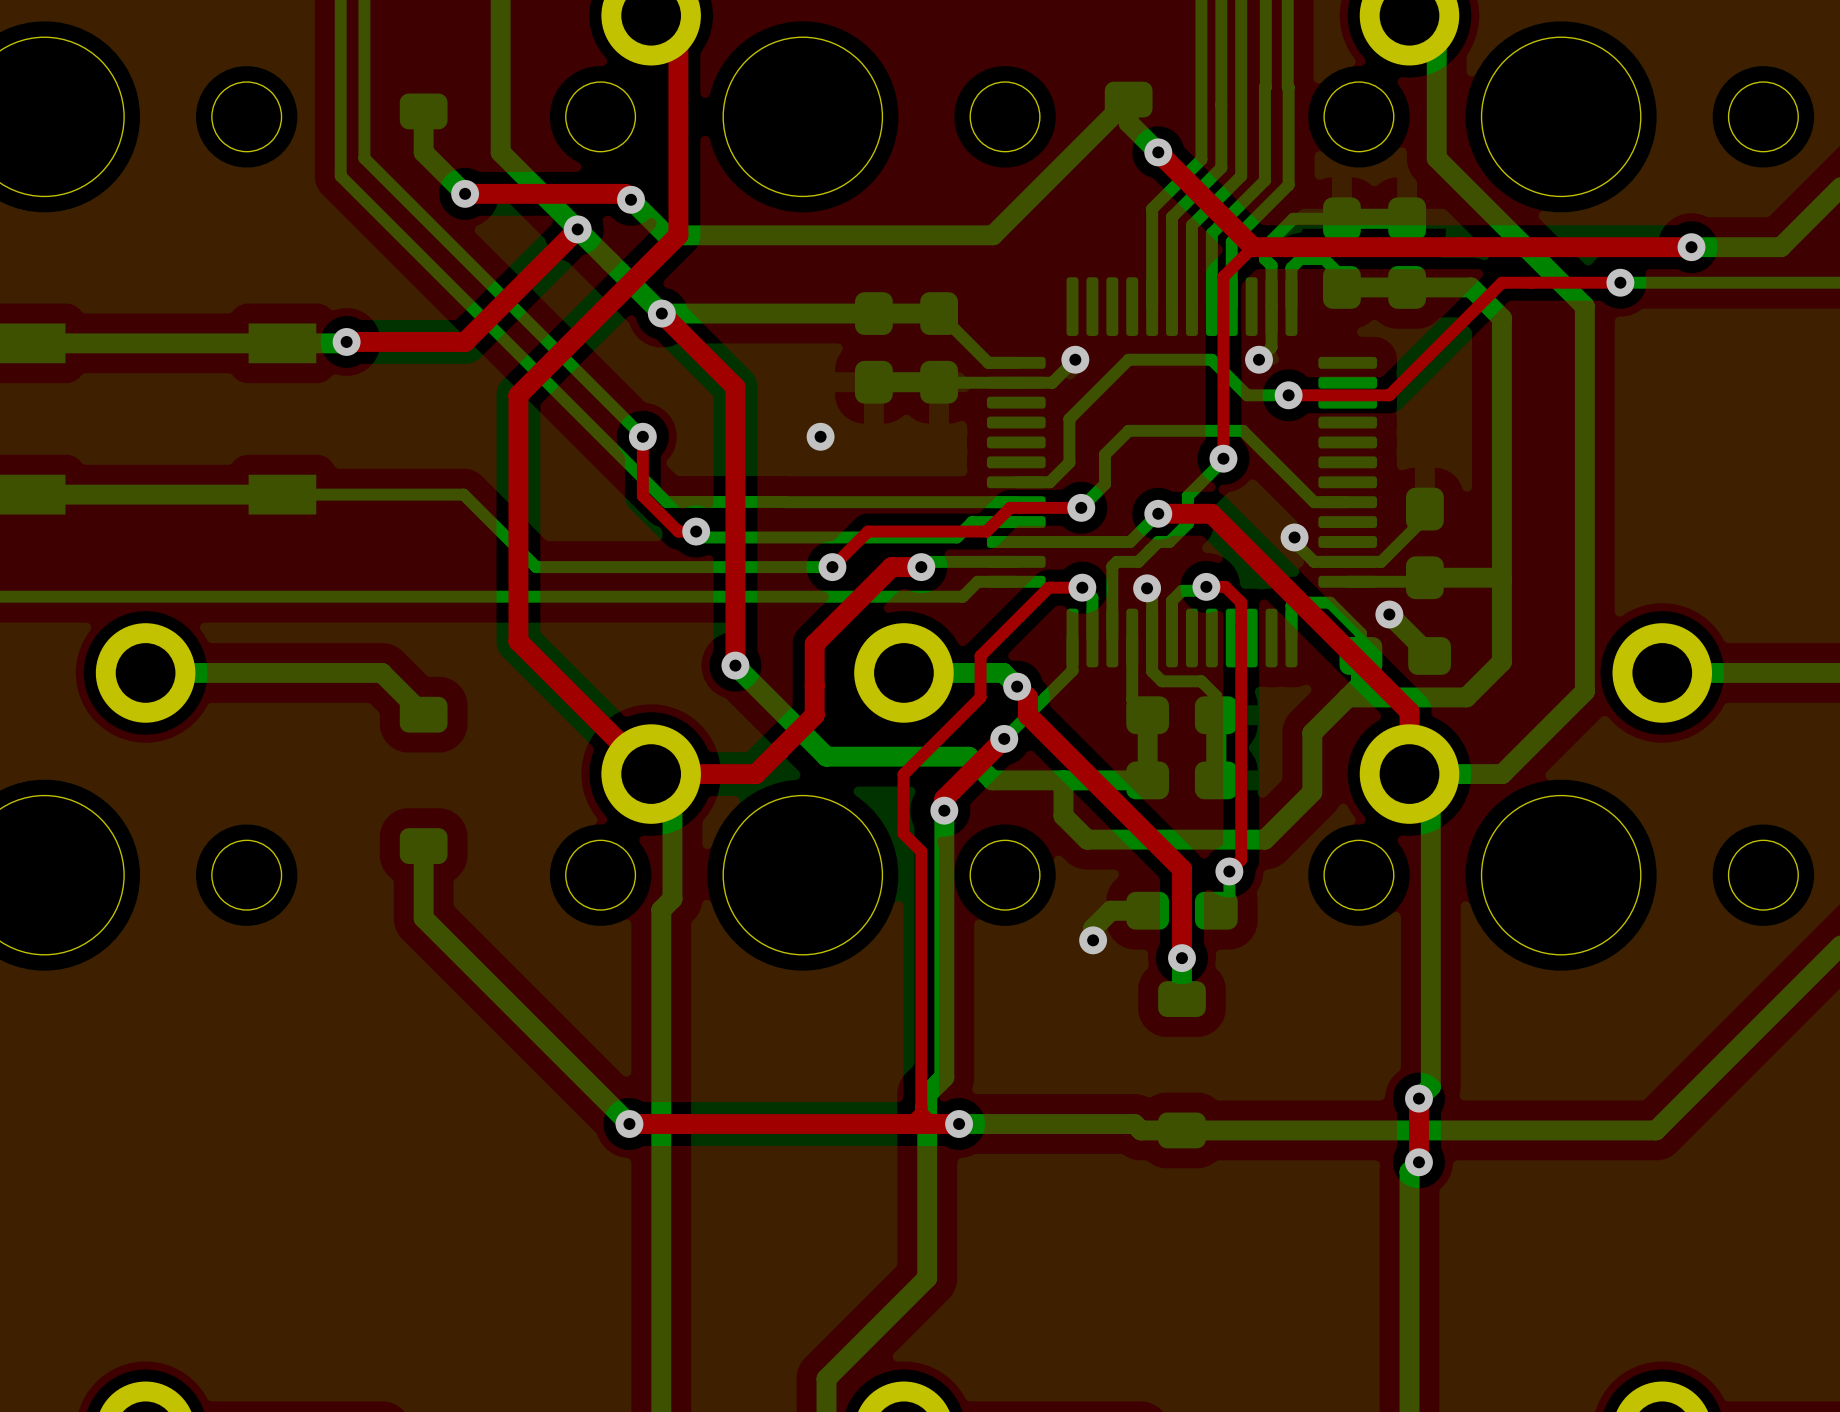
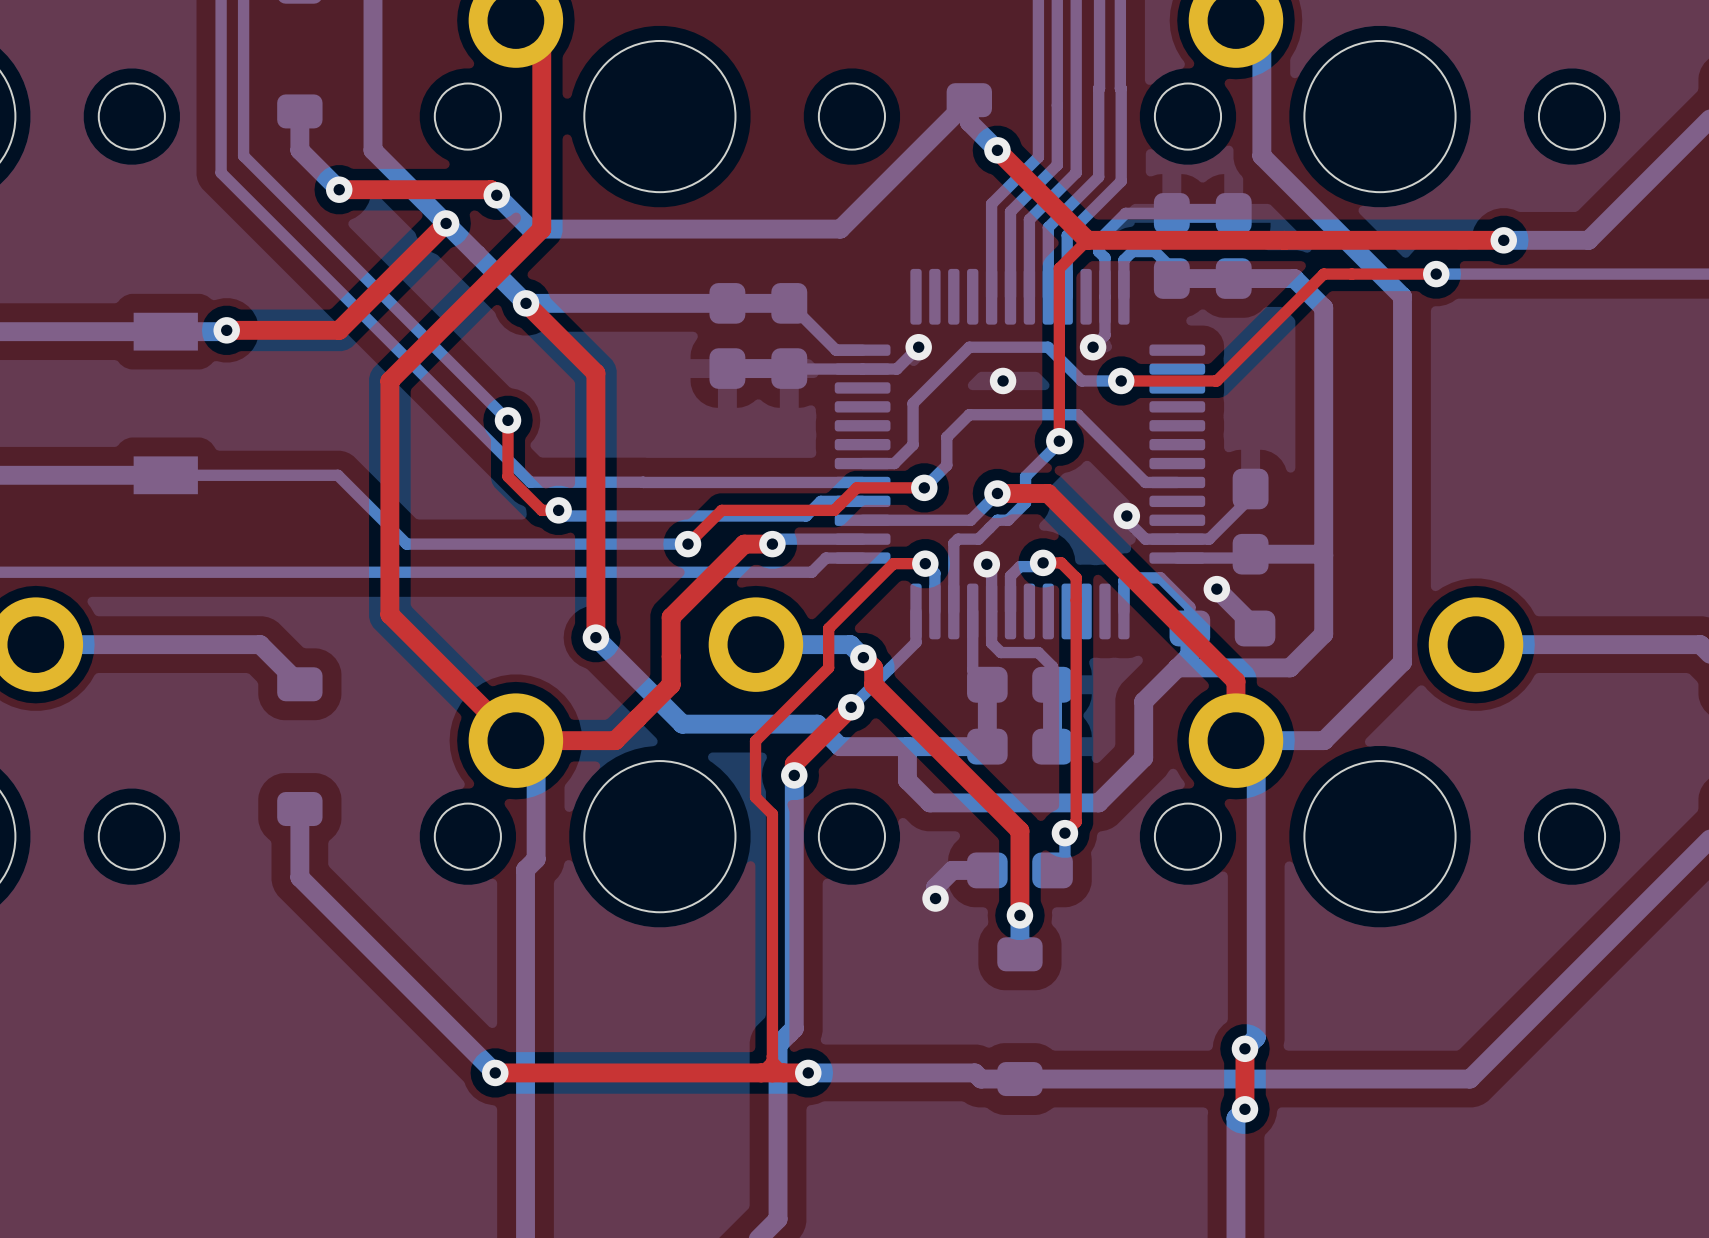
via: none -> (1003, 380)
via: (820, 436) -> none

